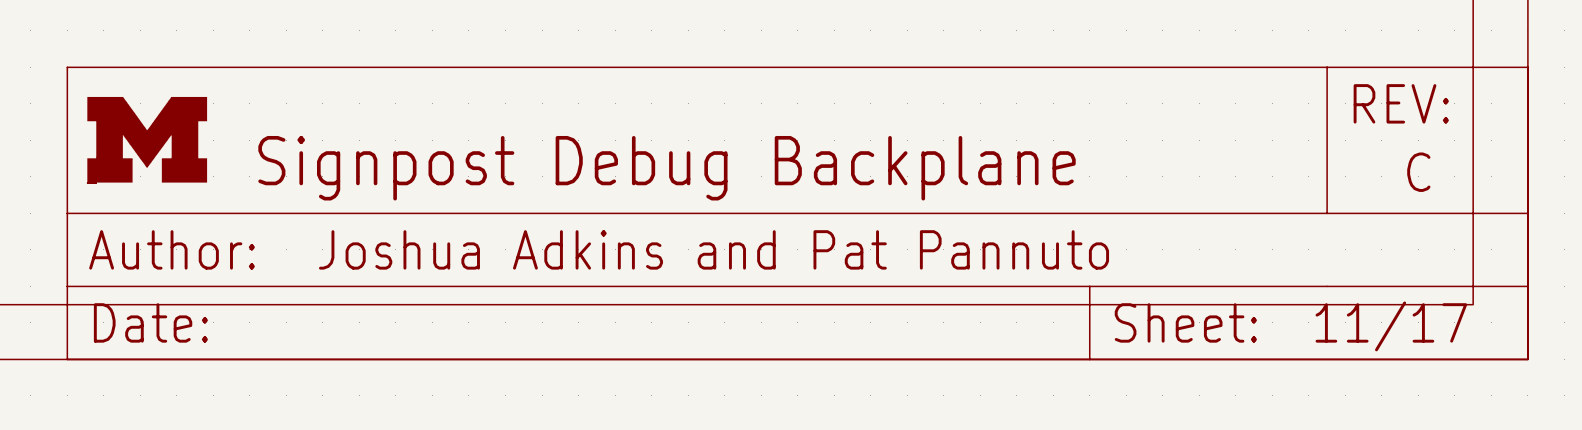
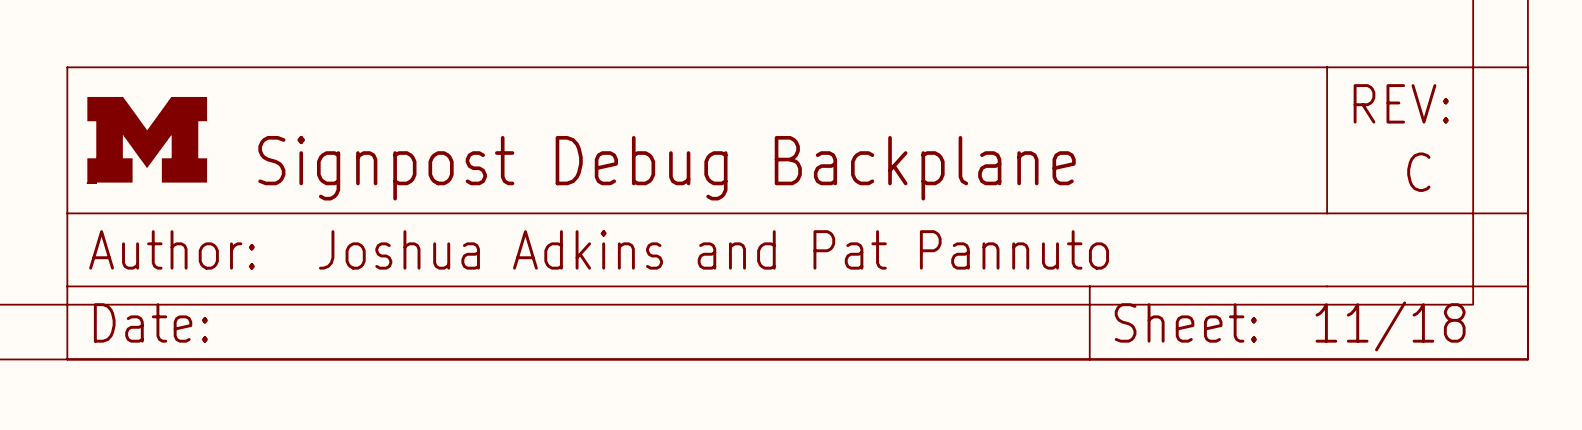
part text: 11/17 (1391, 326) -> 11/18 (1390, 326)

